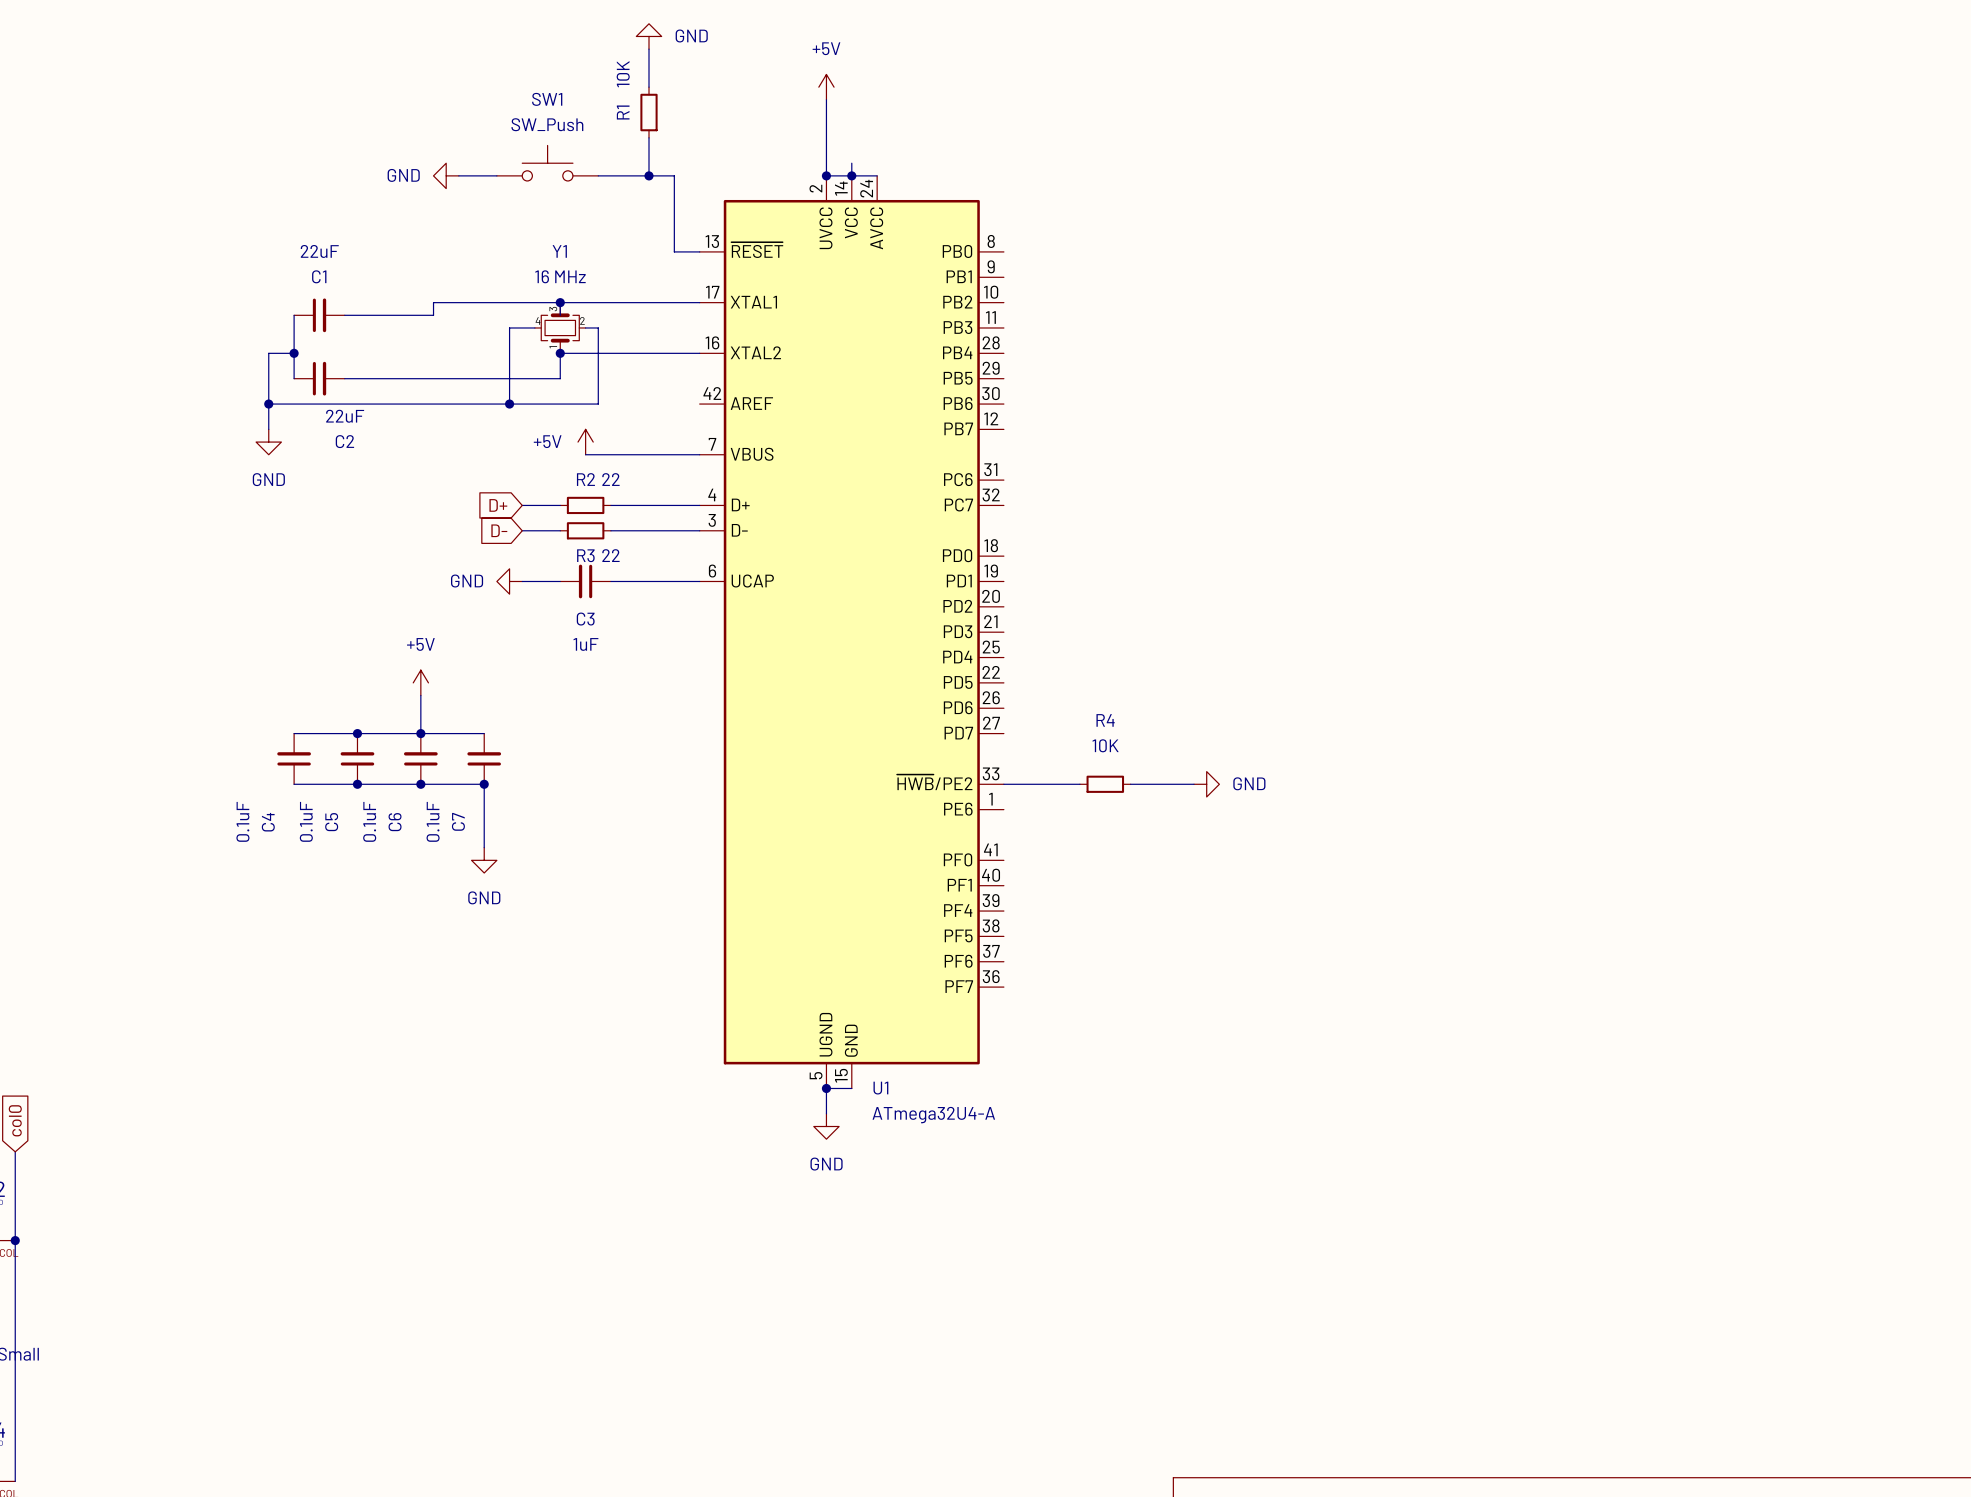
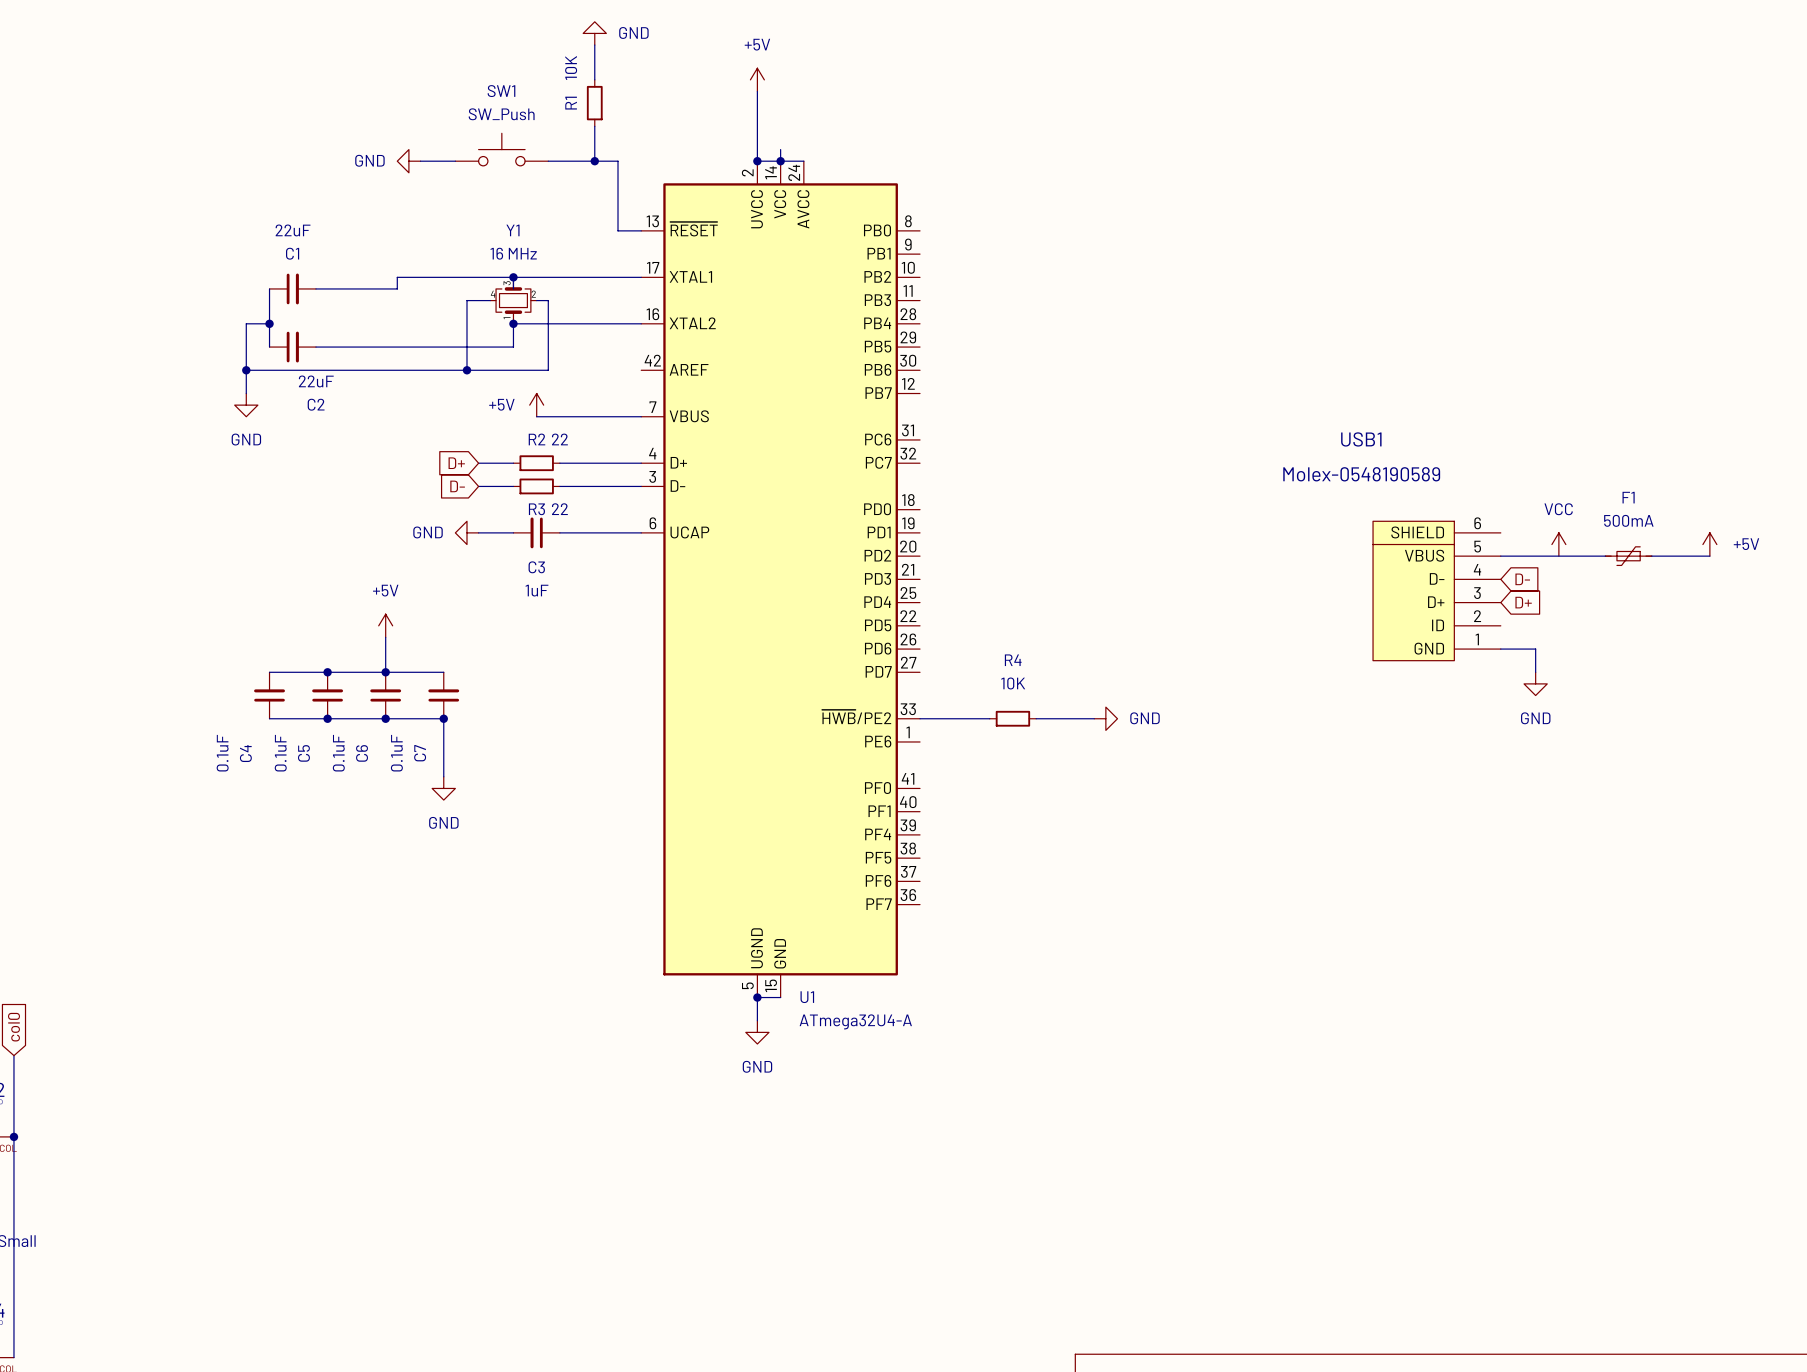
power symbol: none -> VCC (1558, 544)
power symbol: none -> +5V (1709, 544)
wire: none -> (1500, 556) (1605, 556)
F1: none -> 500mA (1628, 556)
wire: none -> (1651, 556) (1709, 556)
global label: none -> D- (1522, 579)
USB1: none -> Molex-0548190589 (1436, 590)
global label: none -> D+ (1523, 602)
wire: none -> (1500, 649) (1535, 649) (1535, 672)
power symbol: none -> GND (1535, 683)

